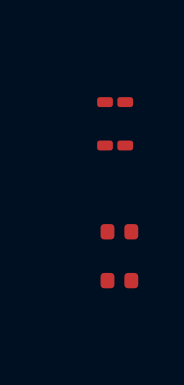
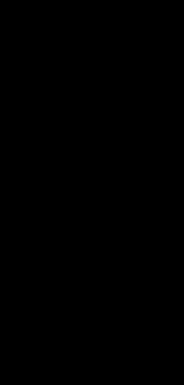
part: (115, 102) -> none
part: (115, 145) -> none
part: (119, 231) -> none
part: (119, 280) -> none

